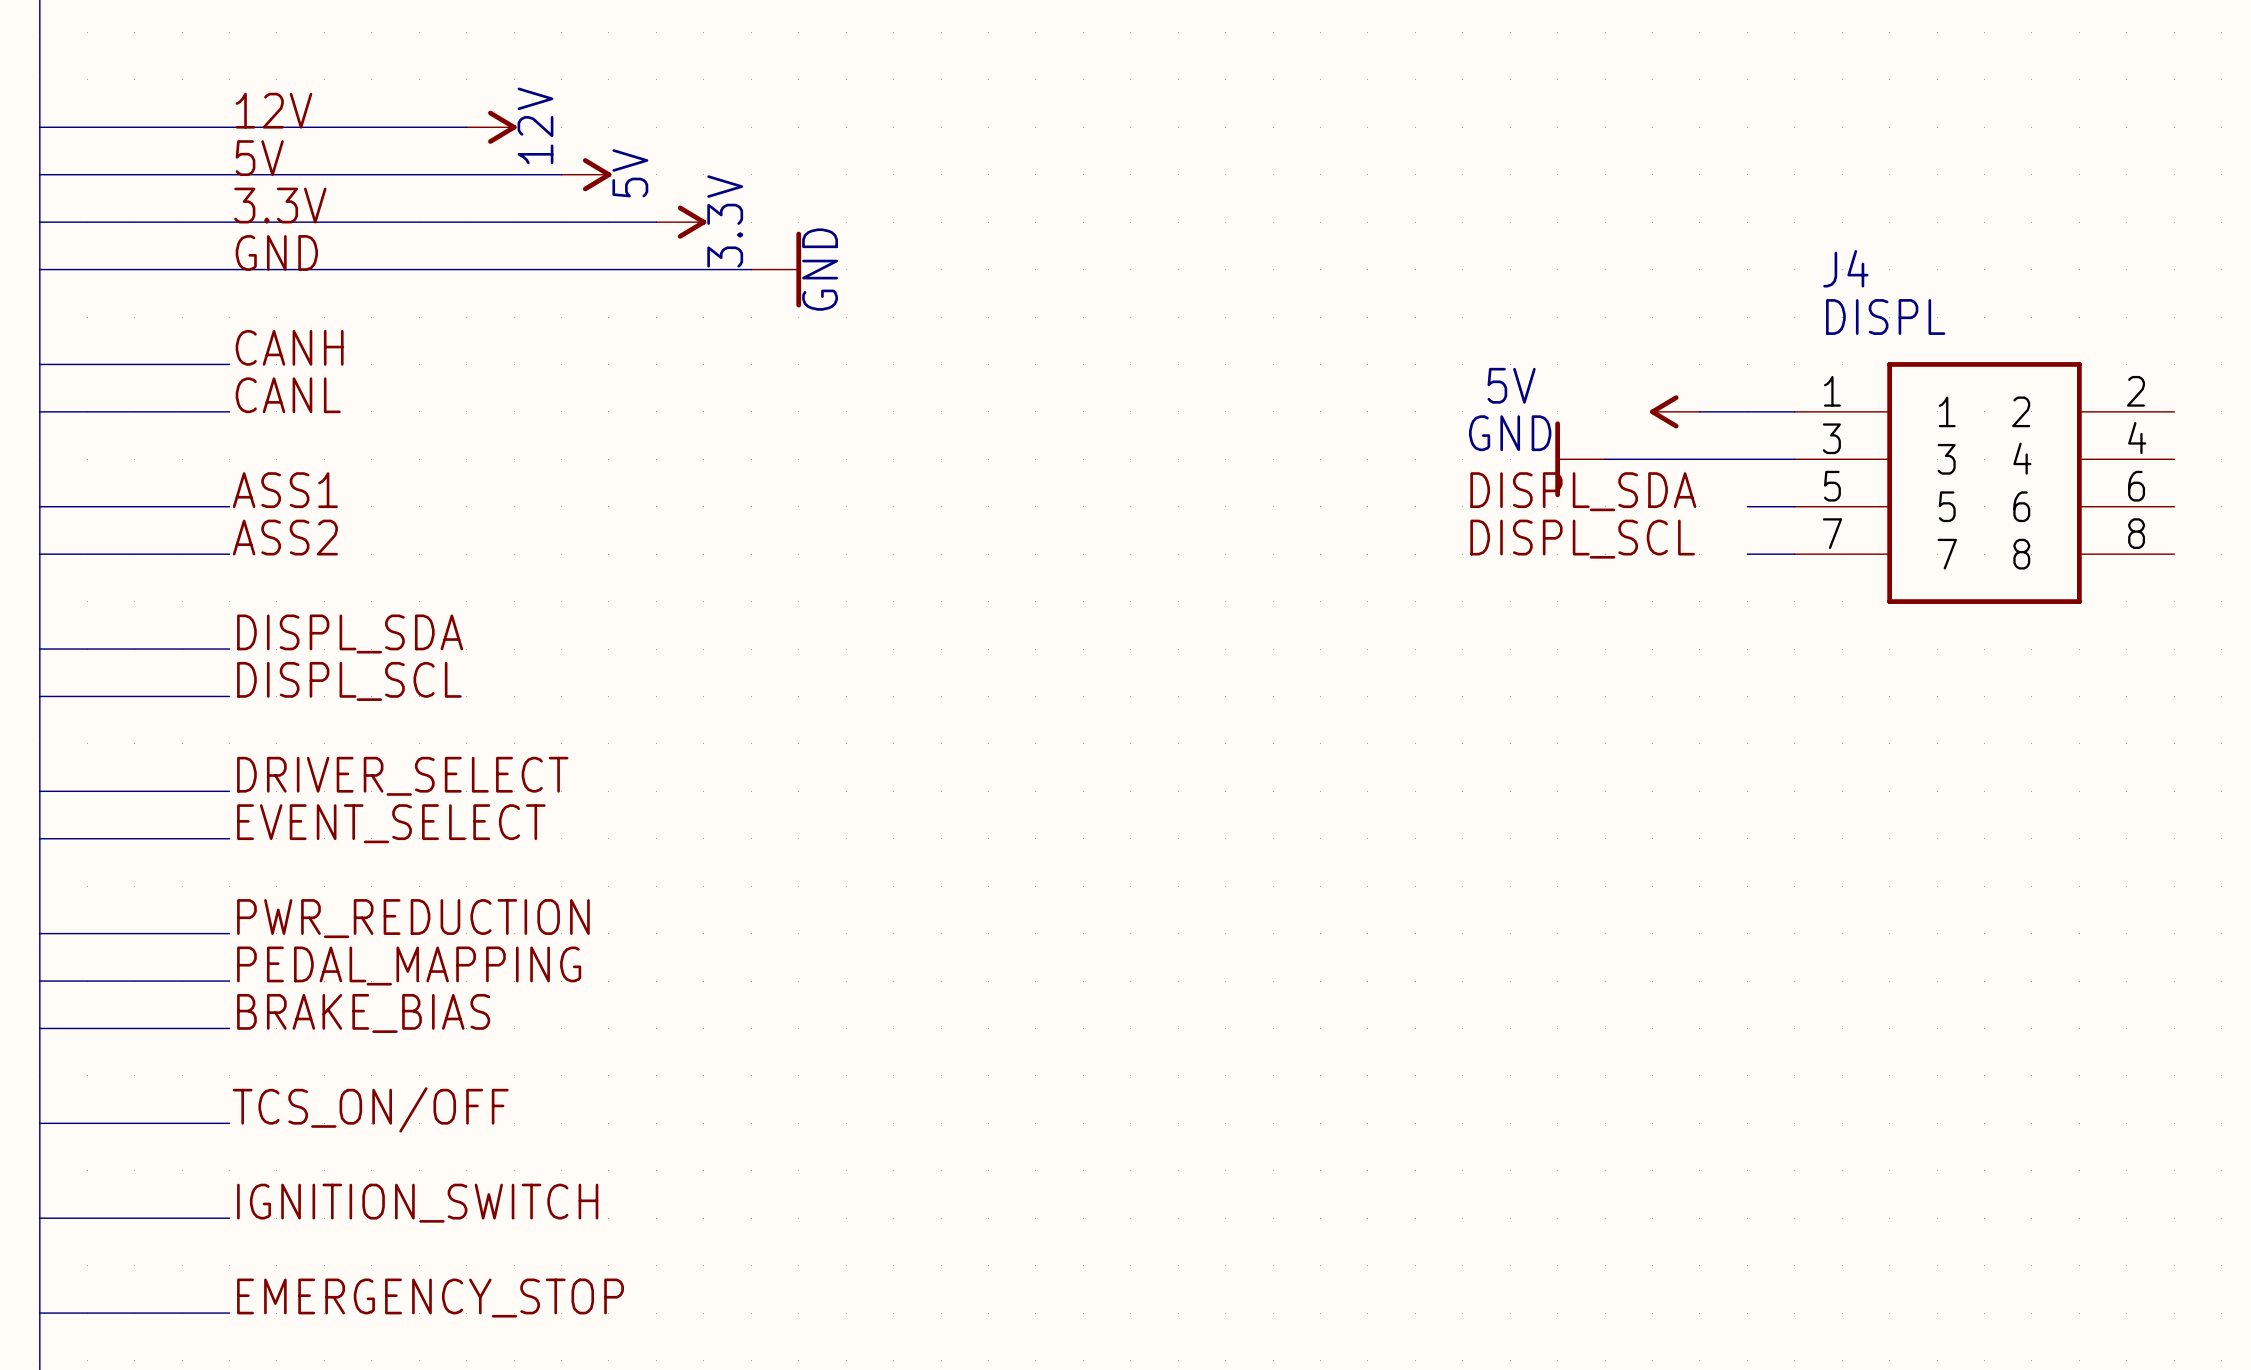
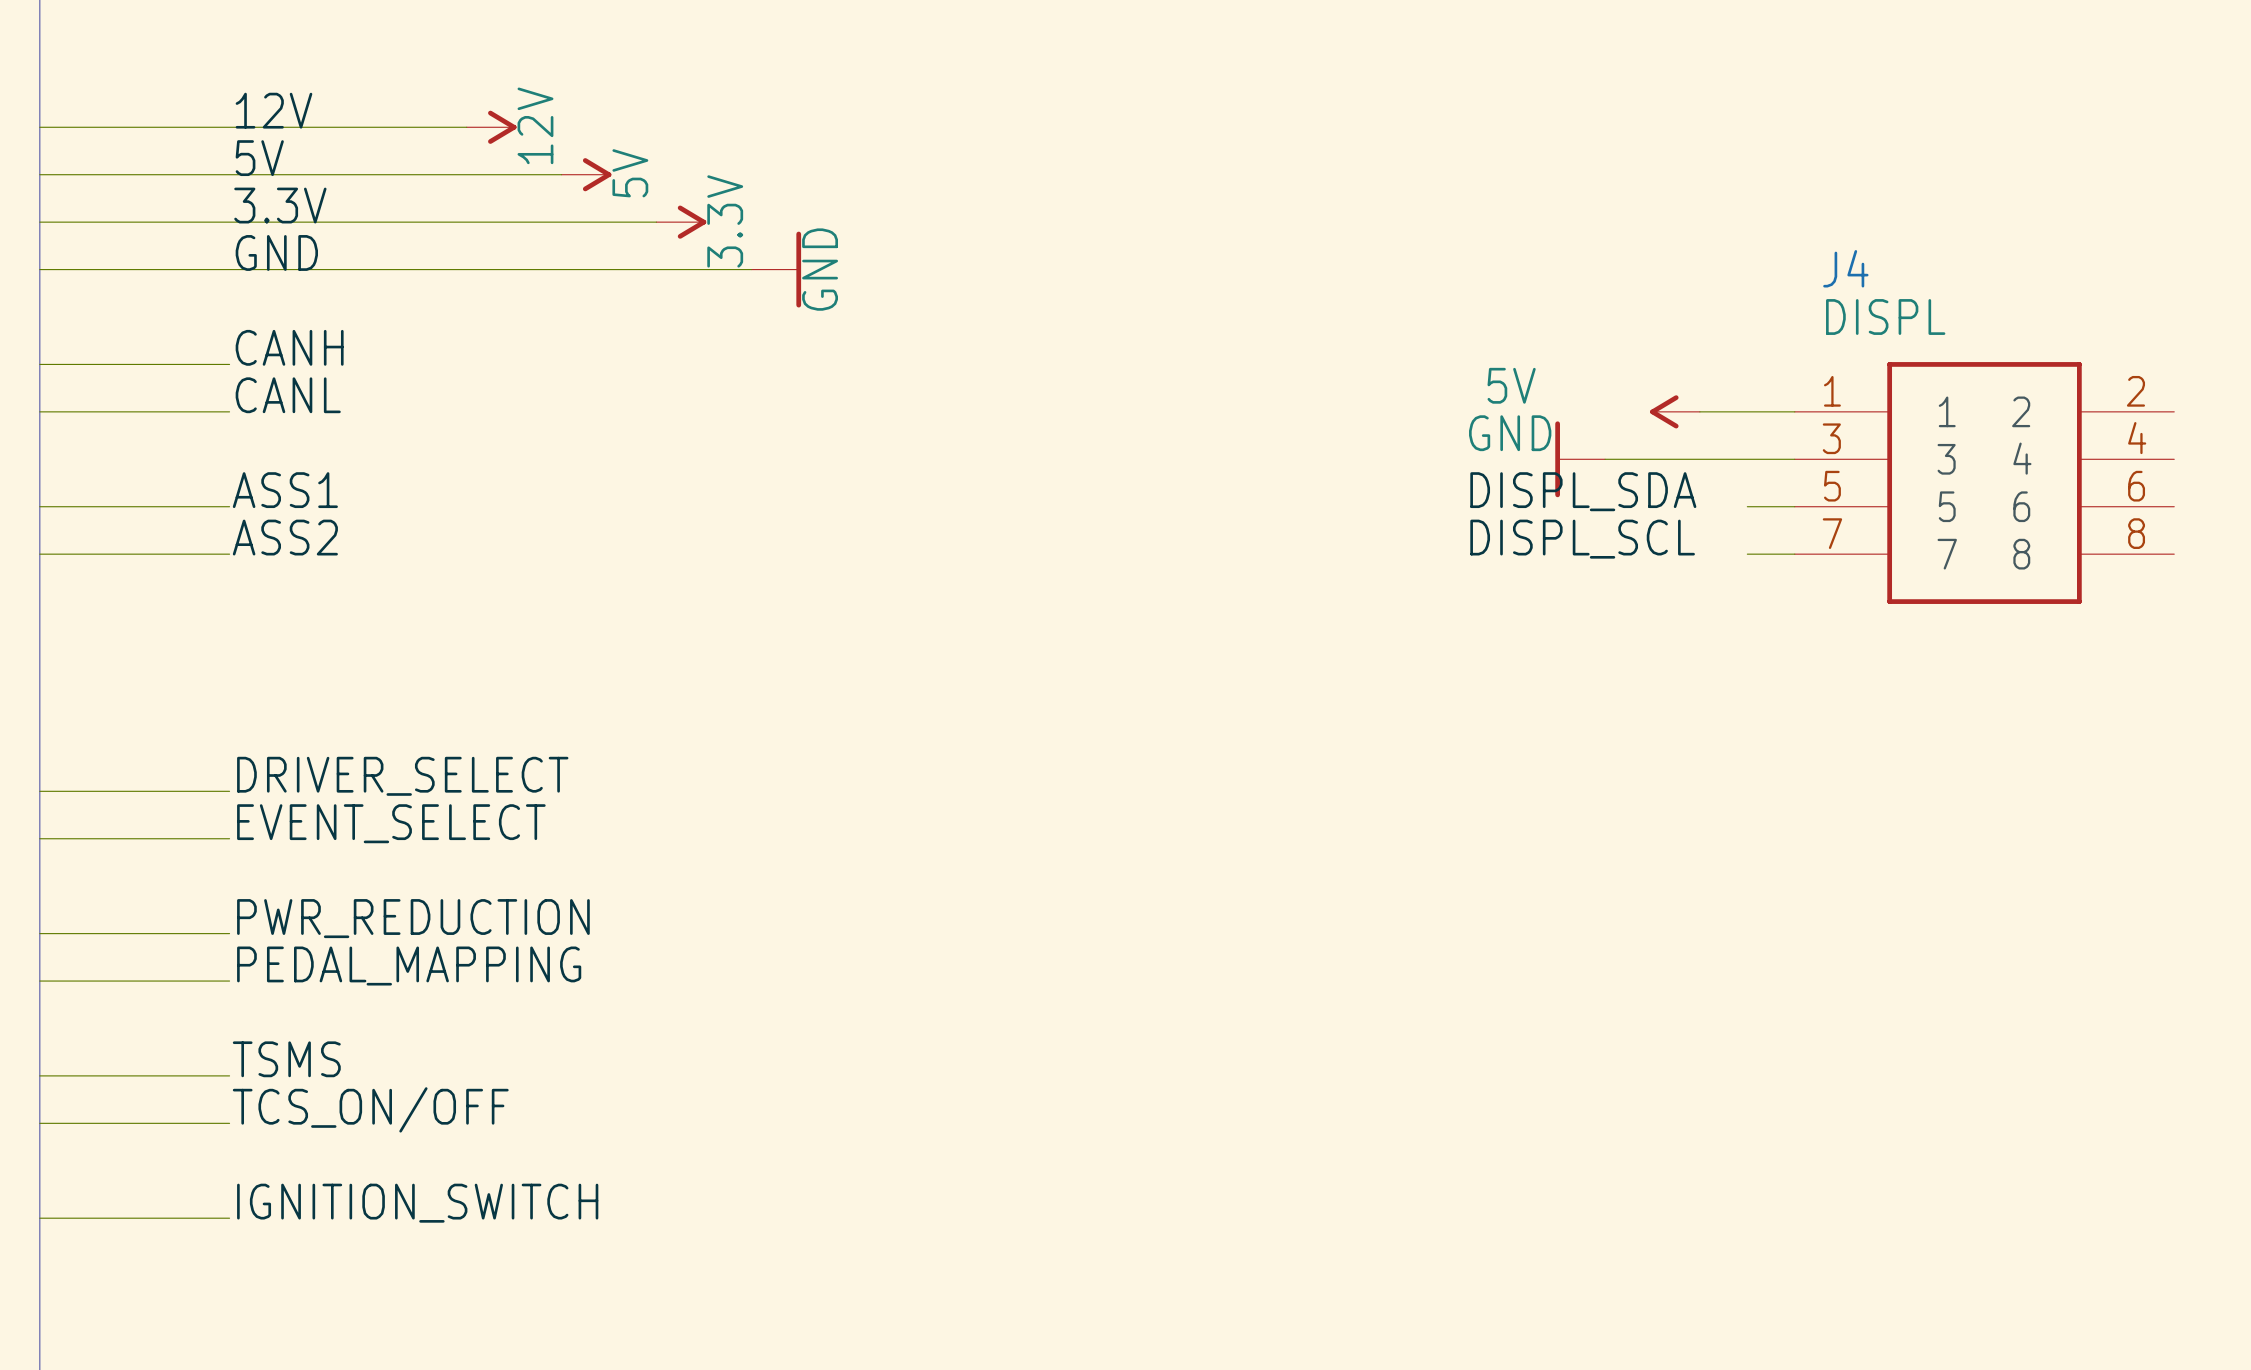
label: DISPL_SDA (350, 634) -> none
wire: (39, 649) (229, 649) -> none
label: DISPL_SCL (349, 681) -> none
wire: (39, 696) (229, 696) -> none
label: BRAKE_BIAS (363, 1013) -> none
wire: (39, 1028) (229, 1028) -> (39, 1075) (229, 1075)
label: none -> TSMS (286, 1059)
label: EMERGENCY_STOP (430, 1298) -> none
wire: (39, 1313) (229, 1313) -> none

